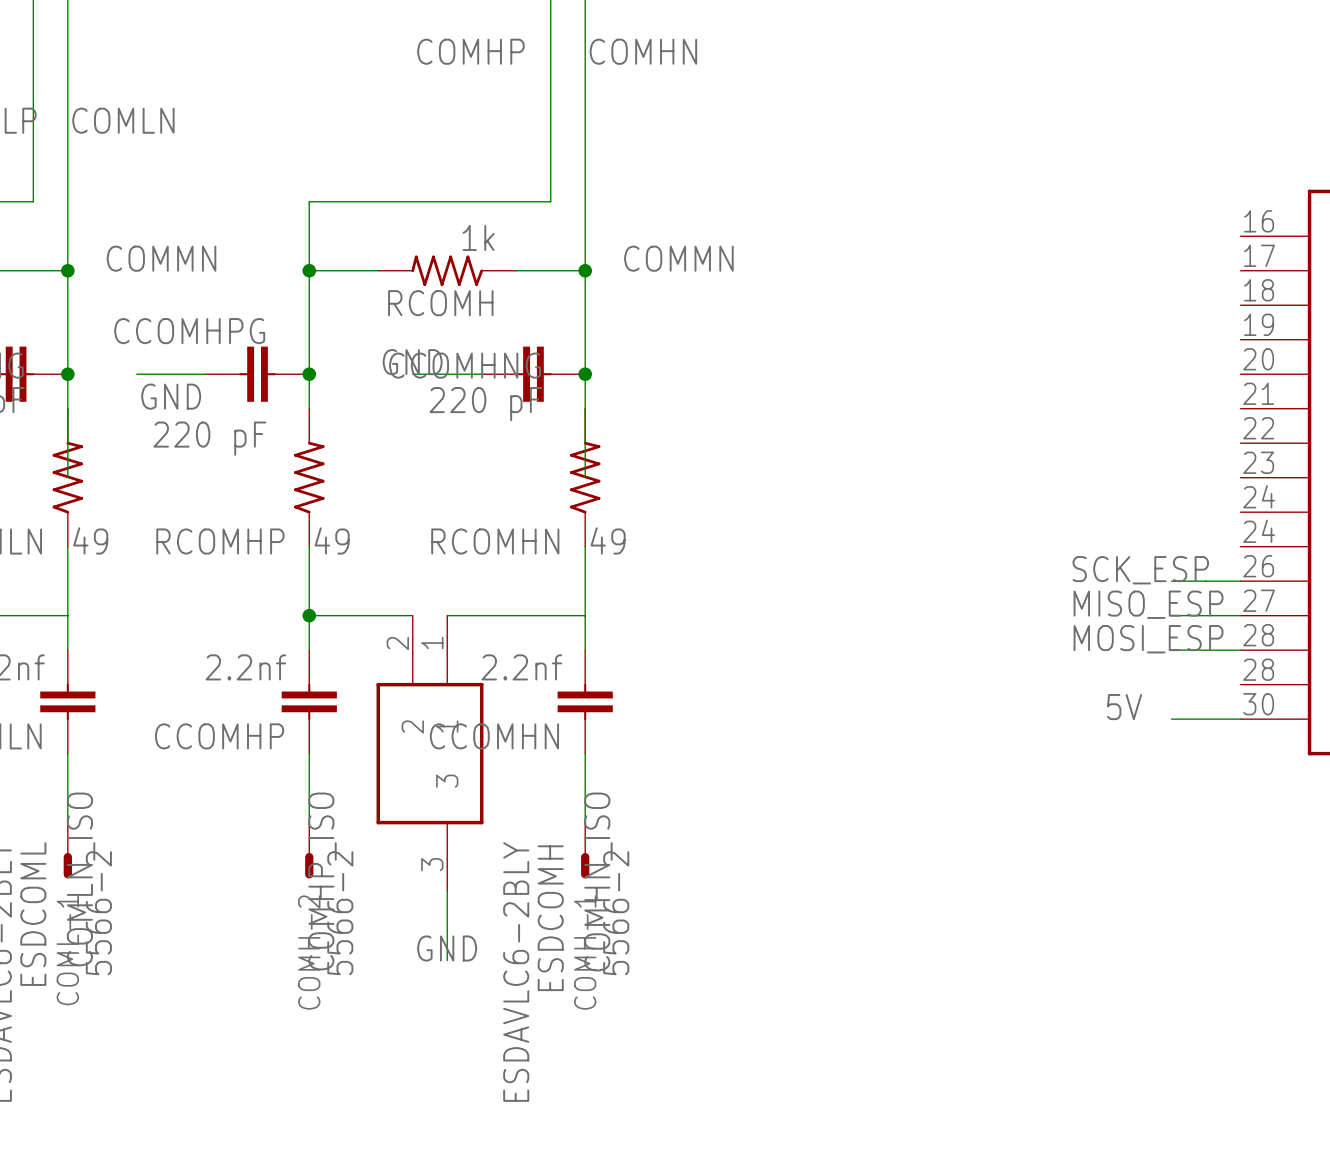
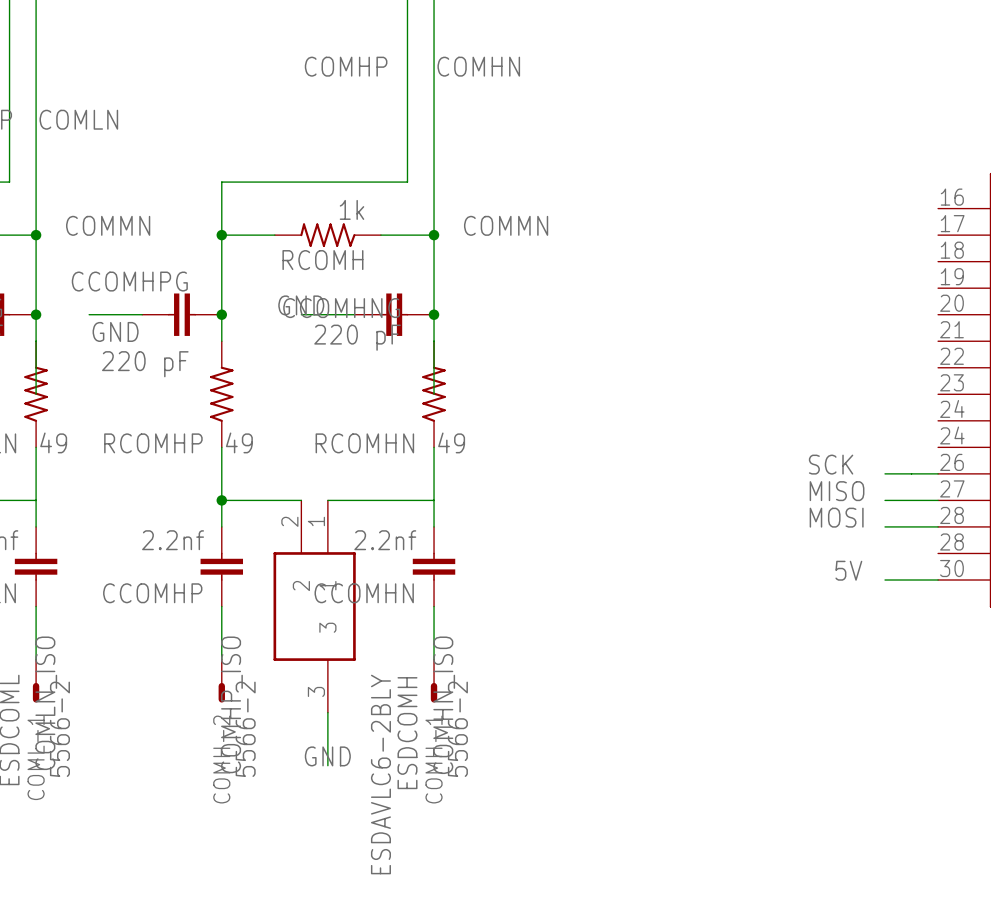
label: SCK_ESP (1140, 570) -> SCK (831, 464)
label: MISO_ESP (1148, 604) -> MISO (837, 491)
label: MOSI_ESP (1148, 639) -> MOSI (836, 517)

